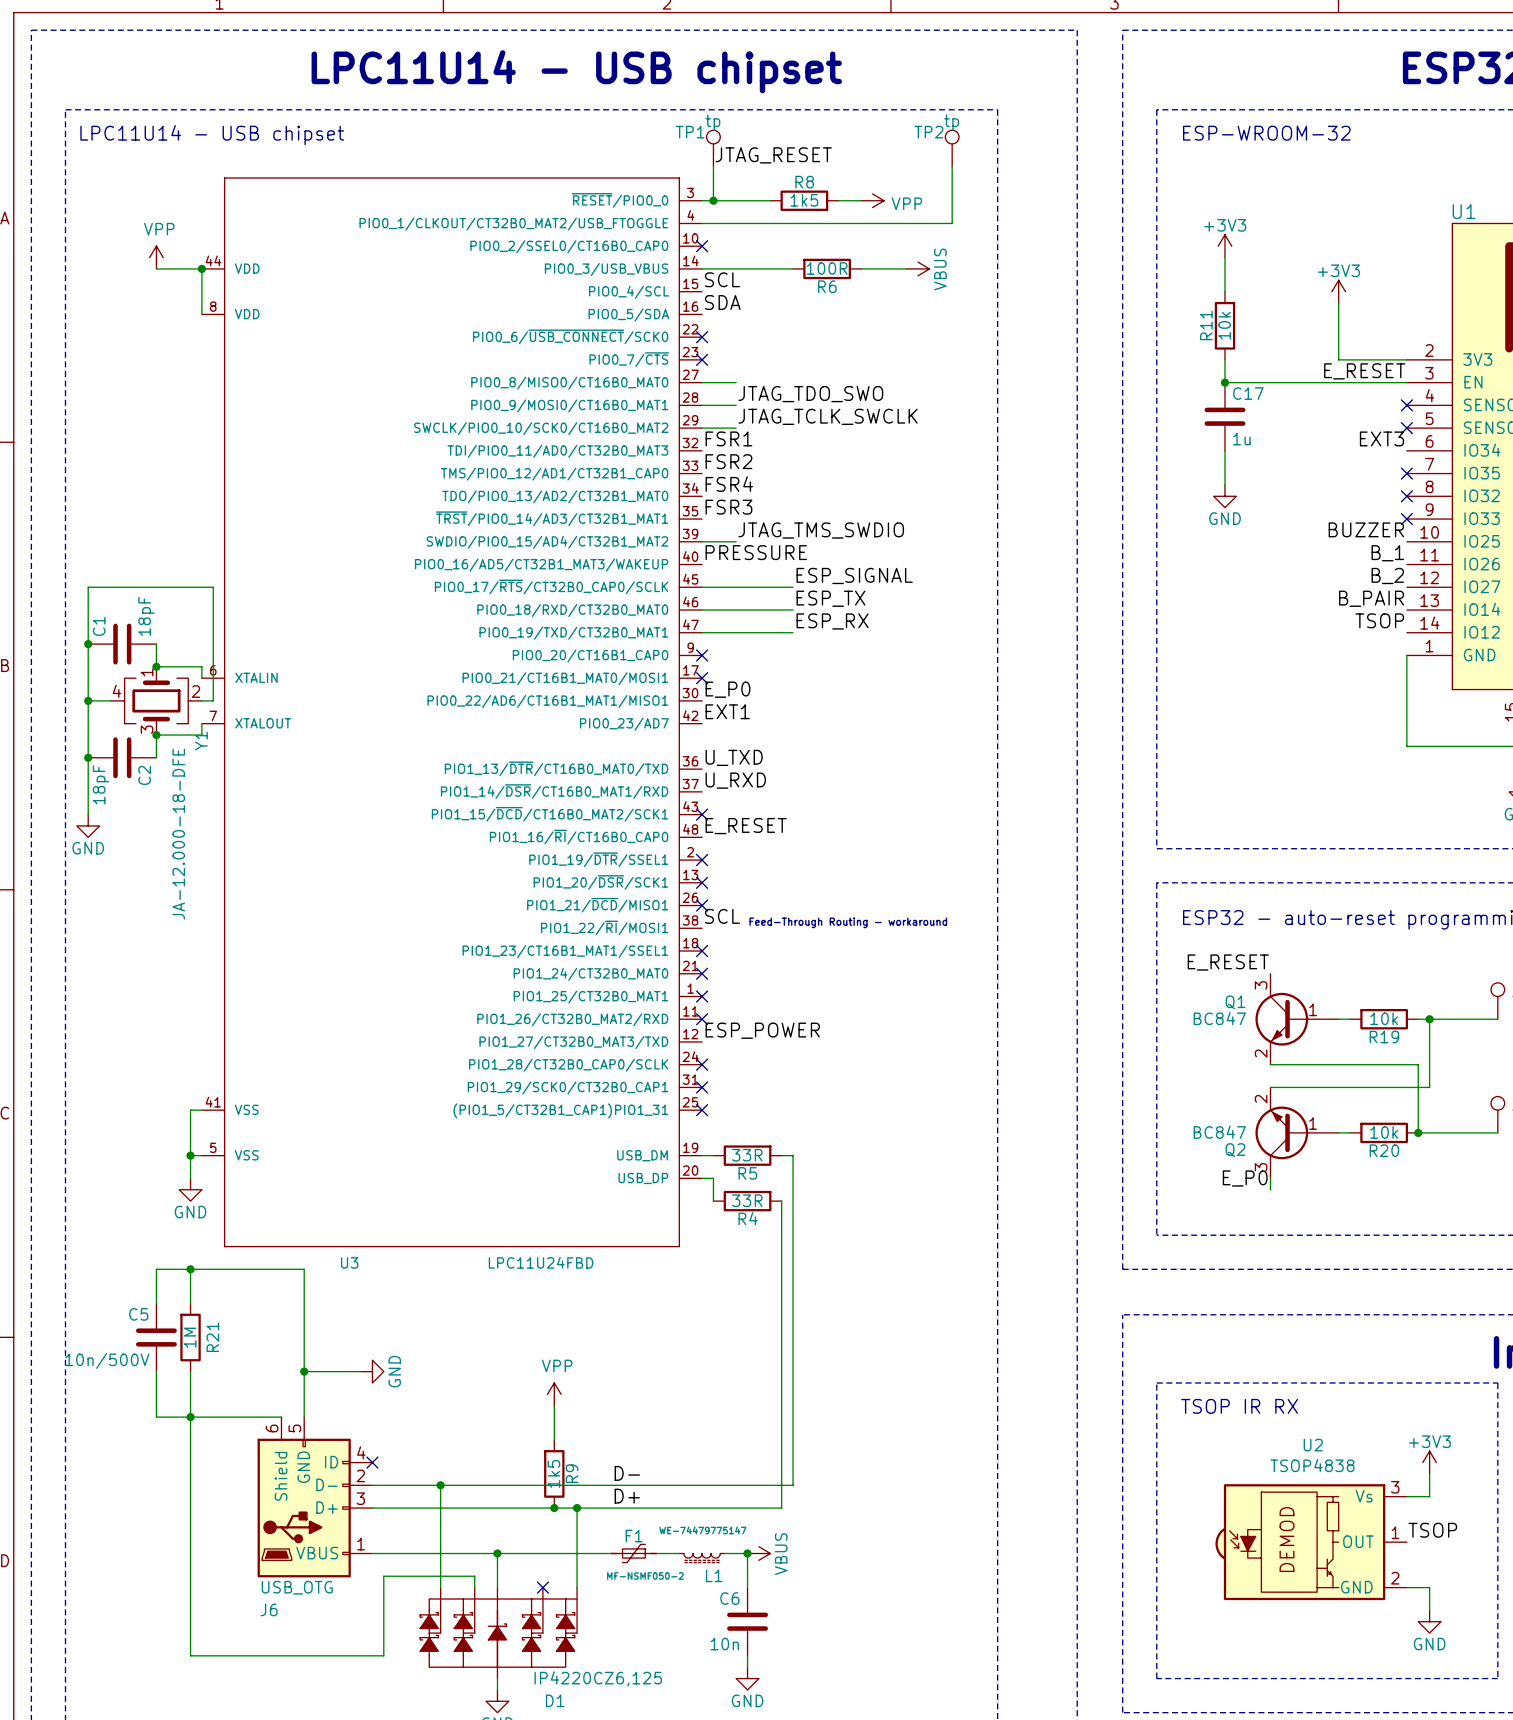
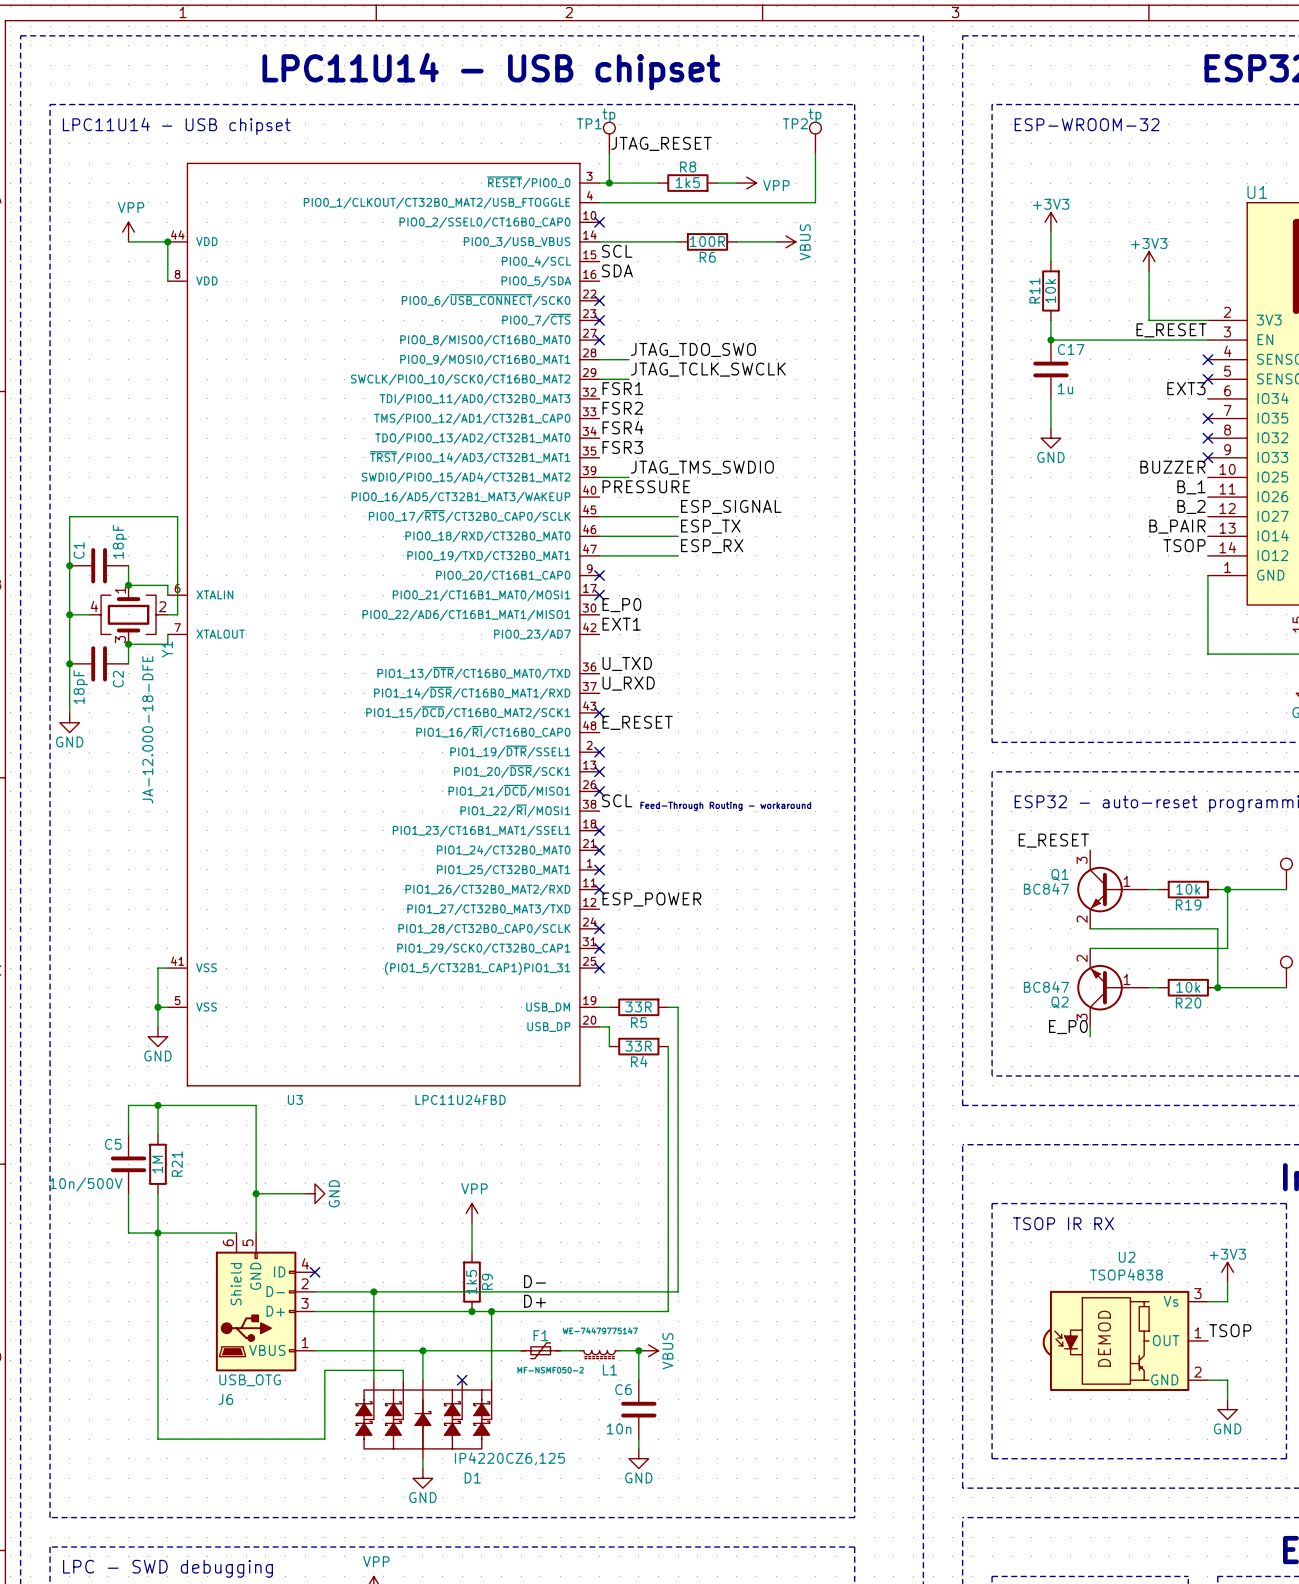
wire: (702, 382) (736, 382) -> none
no-connect mark: none -> (599, 340)

